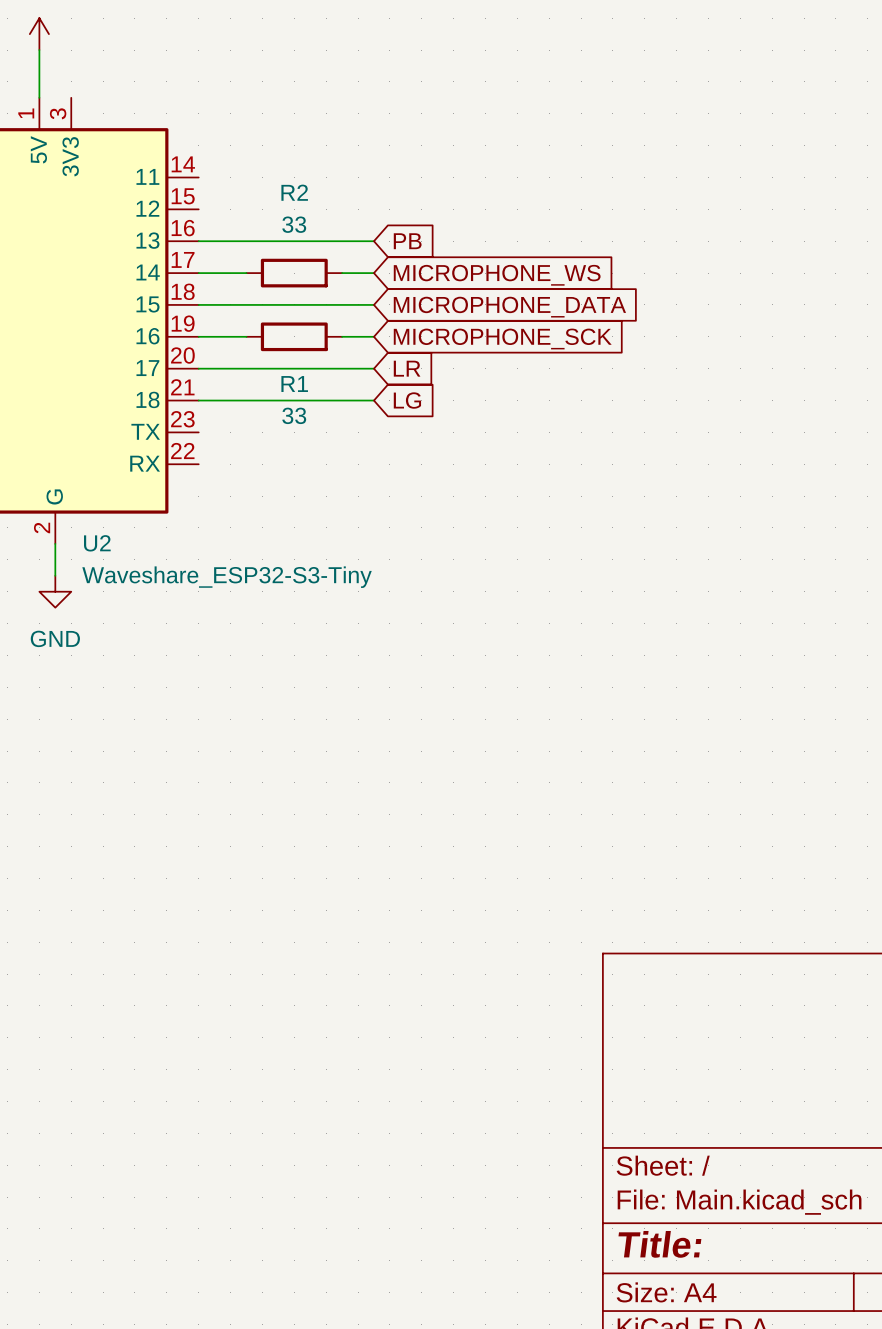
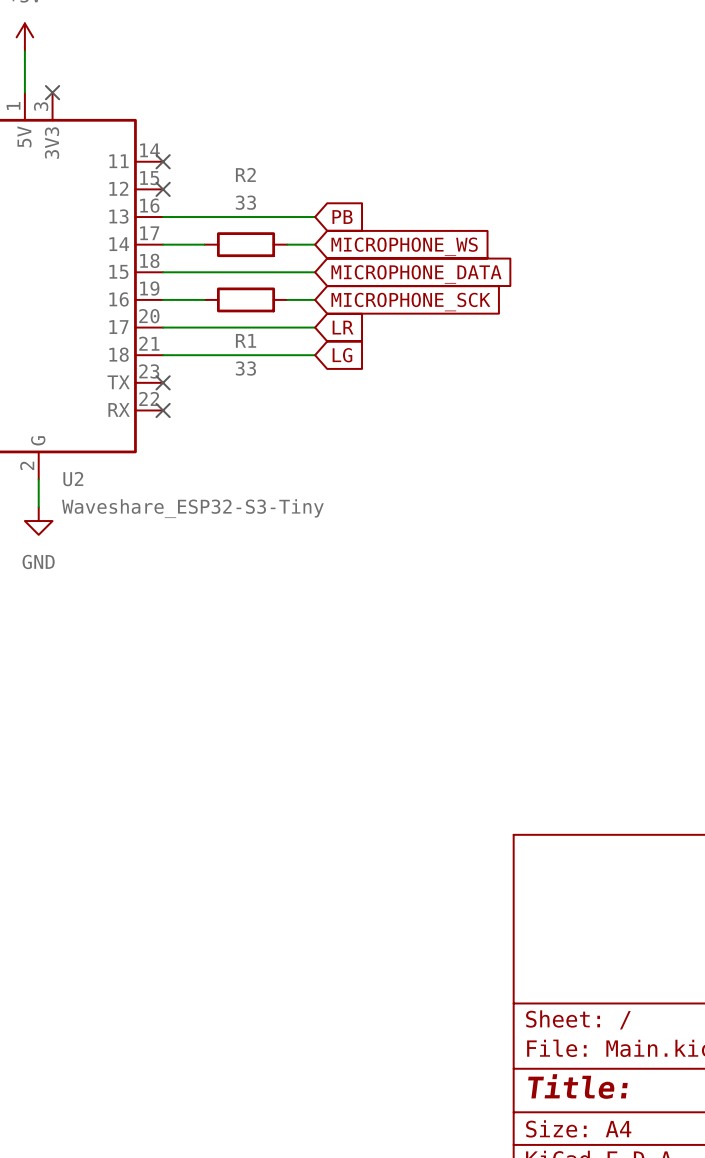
no-connect mark: none -> (52, 92)
no-connect mark: none -> (163, 161)
no-connect mark: none -> (163, 189)
no-connect mark: none -> (163, 382)
no-connect mark: none -> (163, 410)

